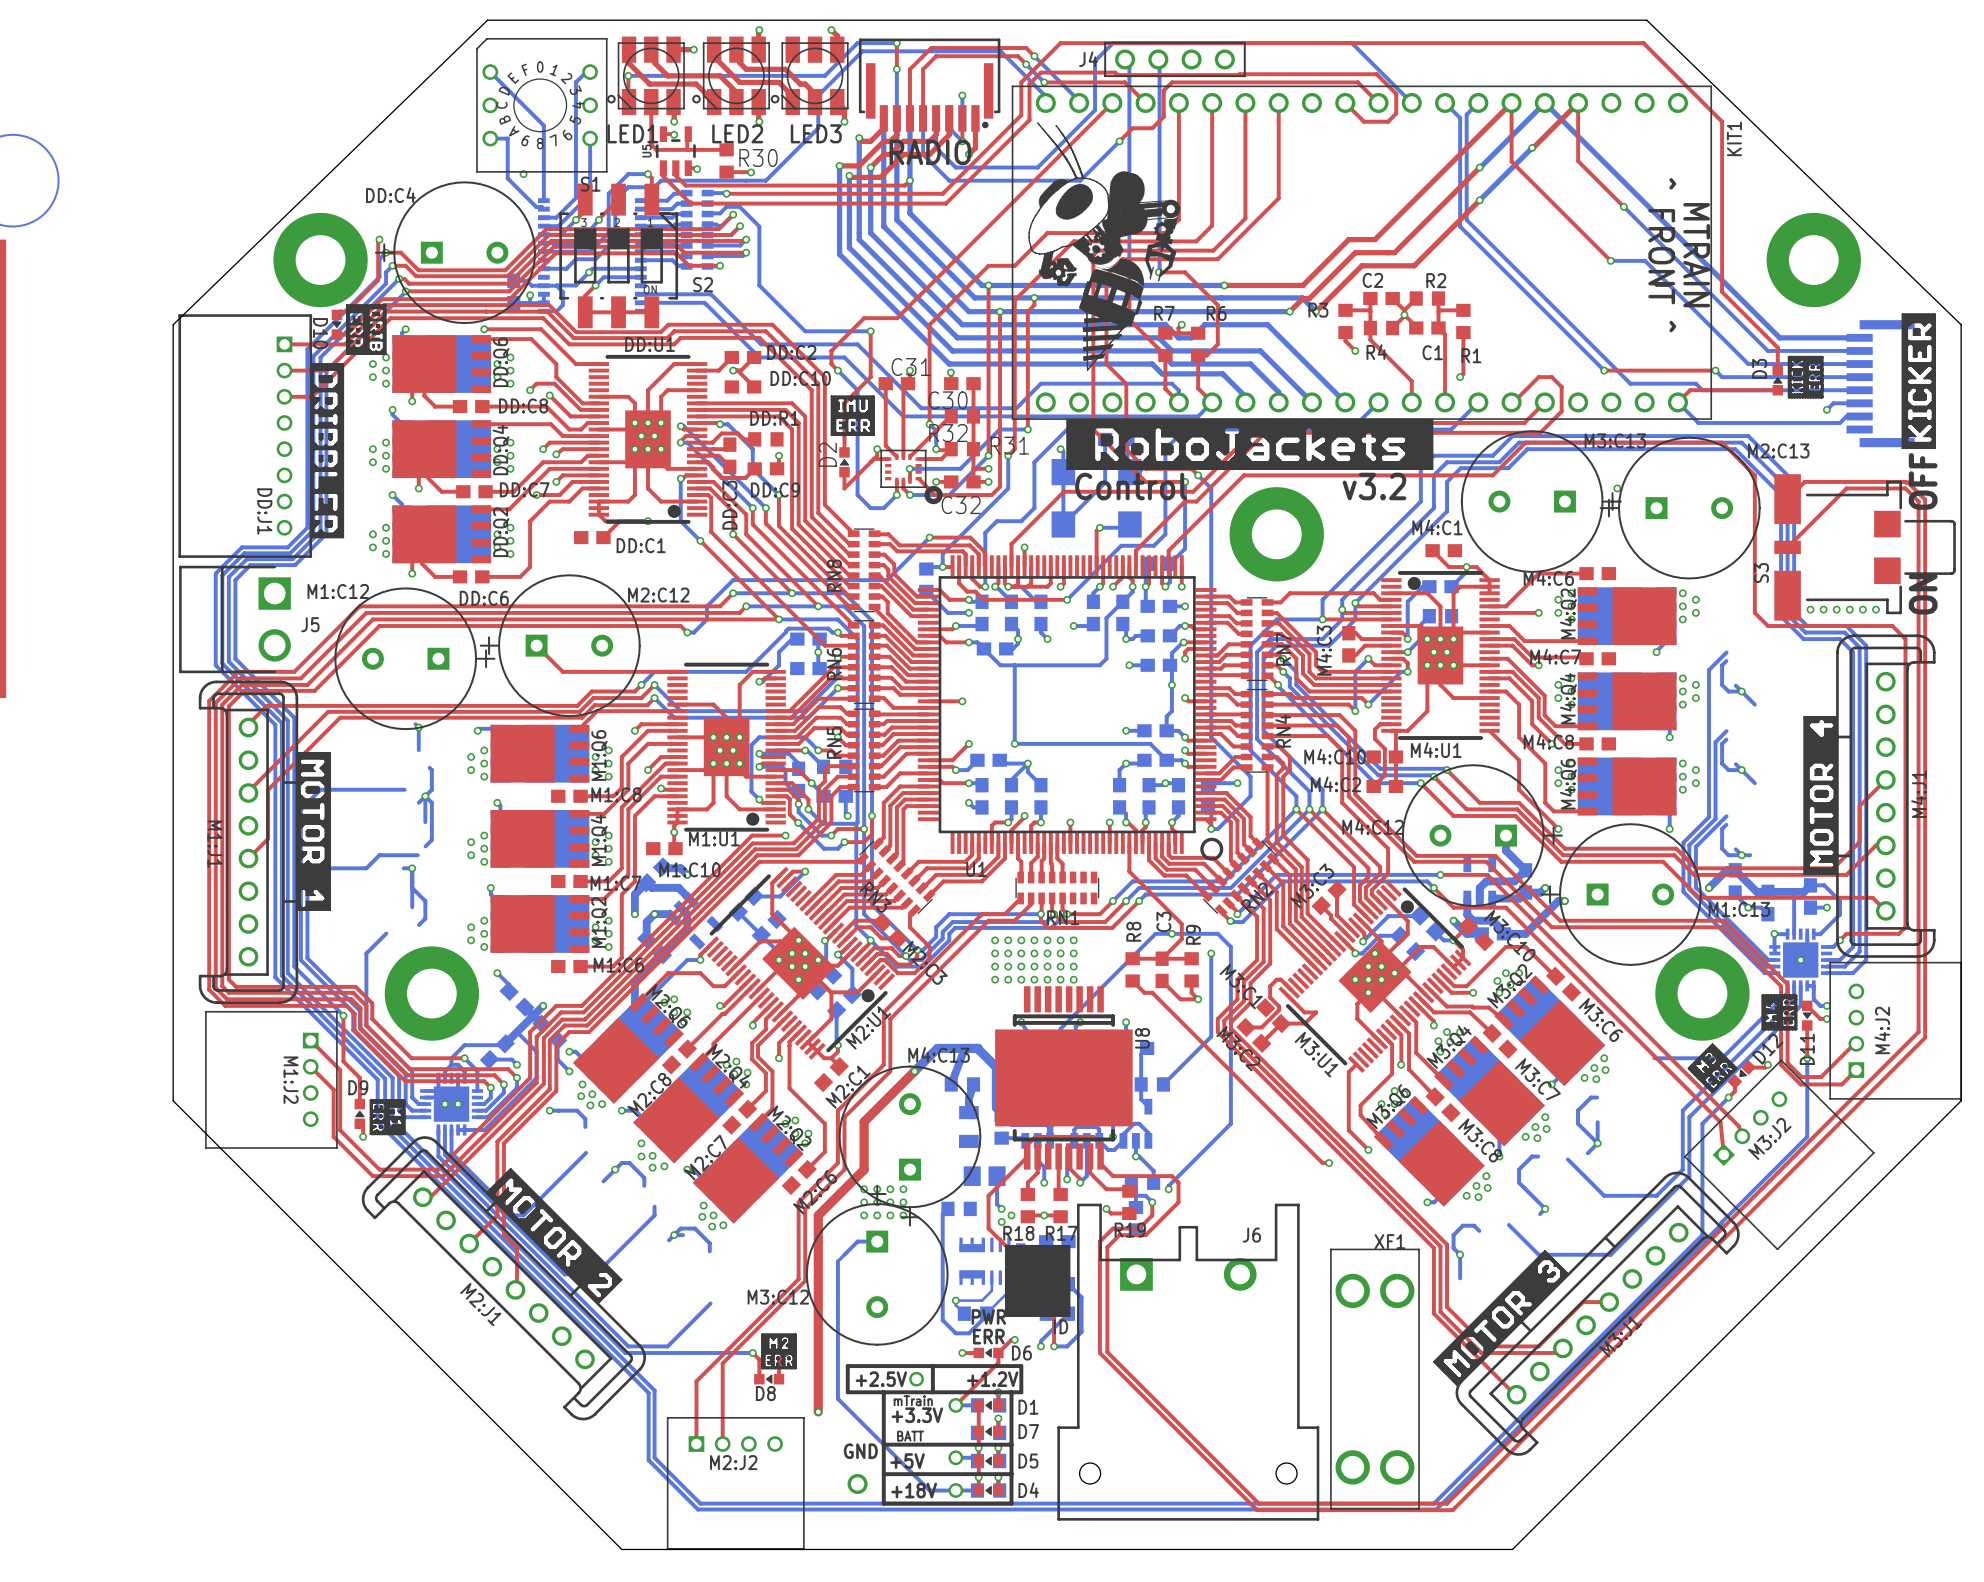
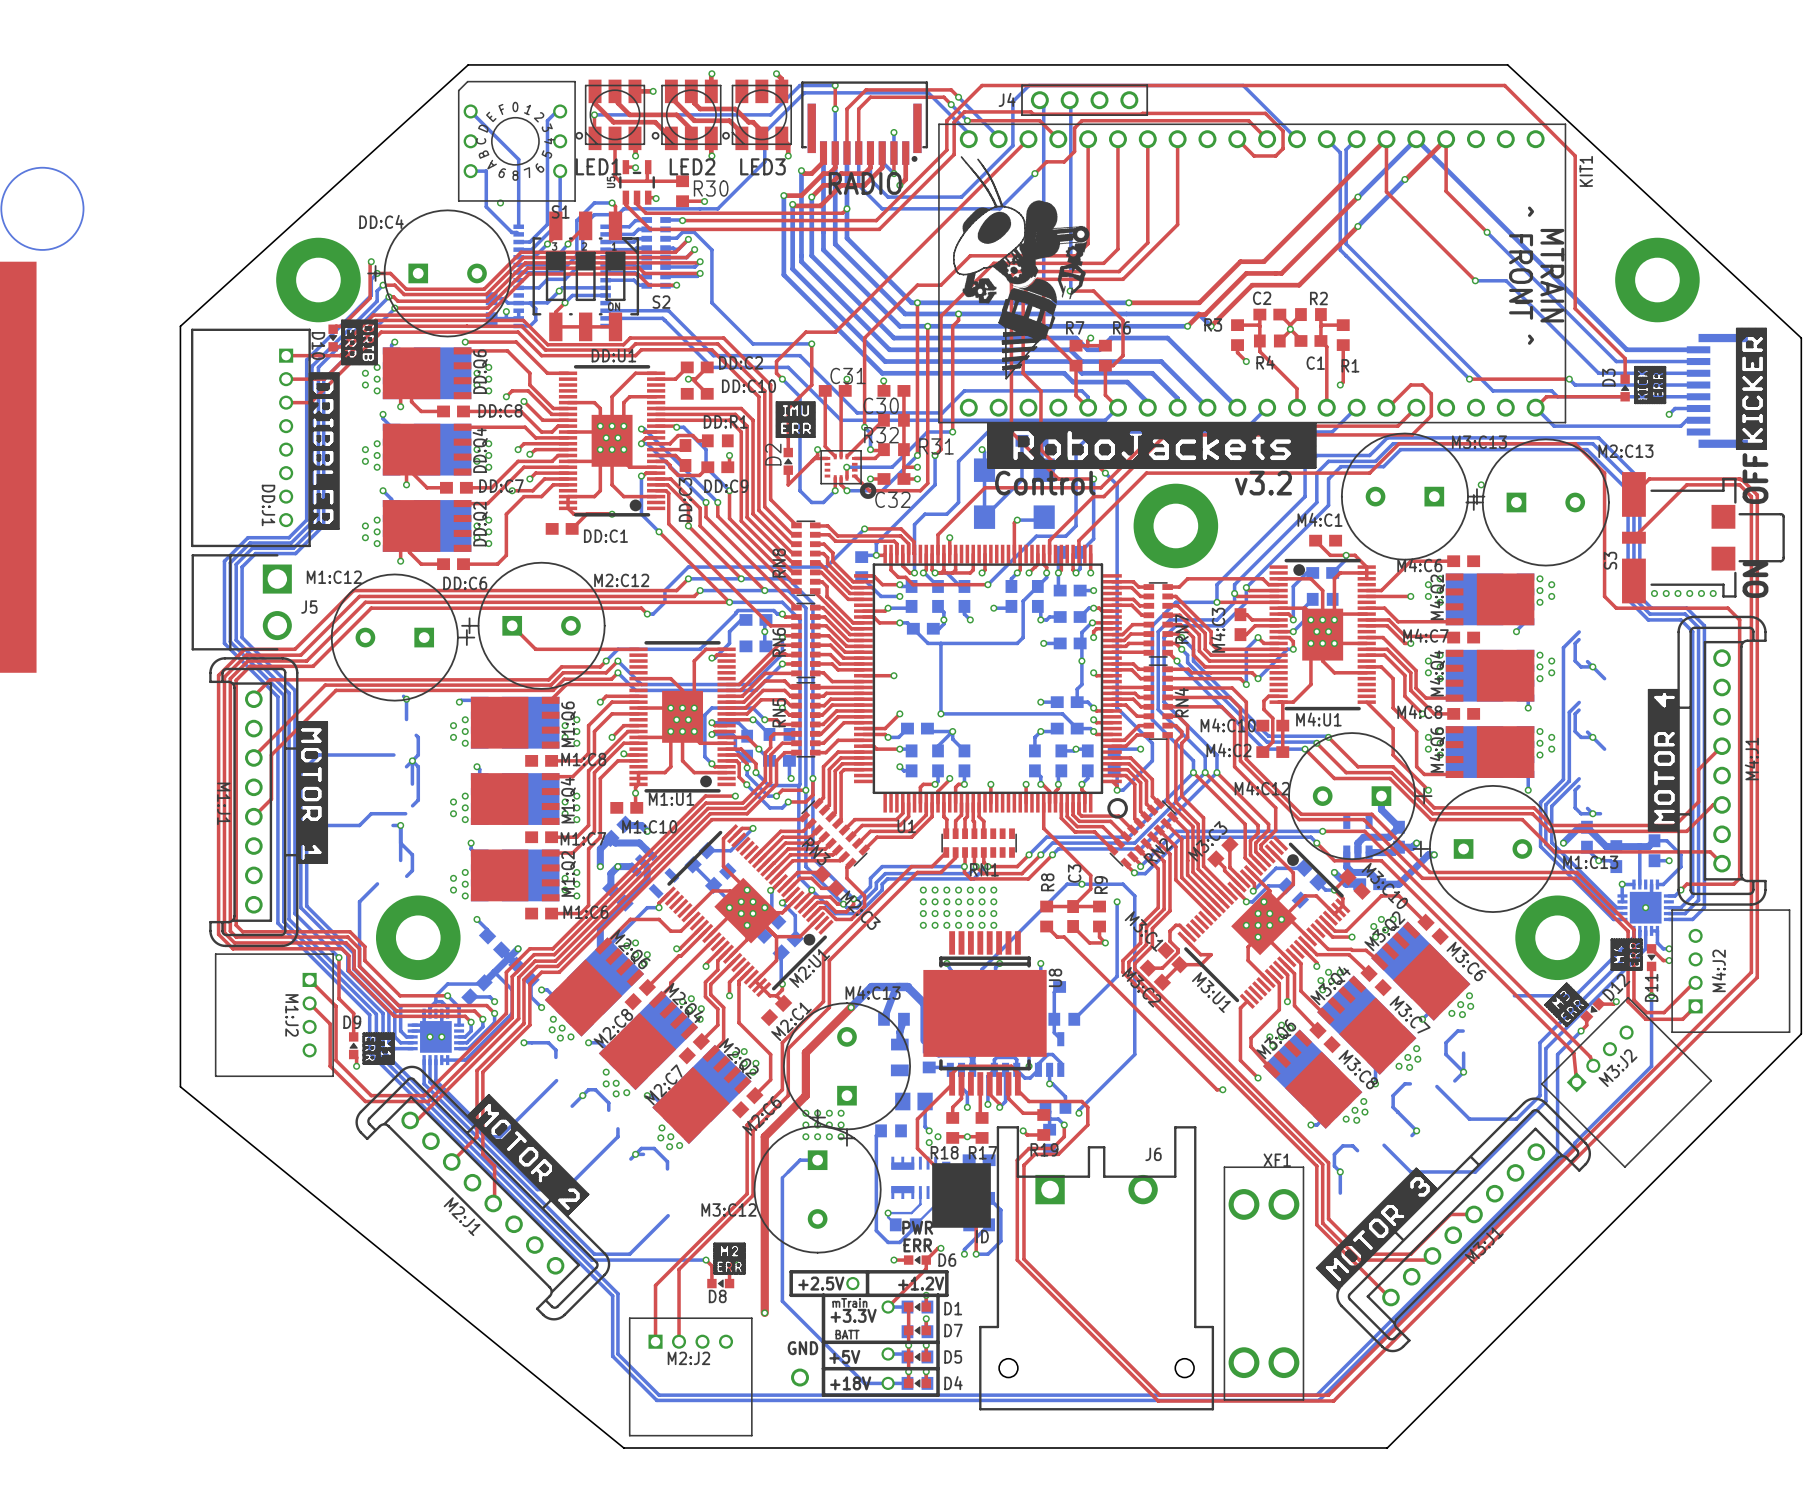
board edge: (487, 20) (173, 324) (173, 1100) (621, 1549) (1512, 1549) (1961, 1100) (1961, 324) (1646, 20) -> (468, 64) (180, 326) (180, 1086) (623, 1448) (1387, 1448) (1801, 1033) (1801, 338) (1507, 64)

